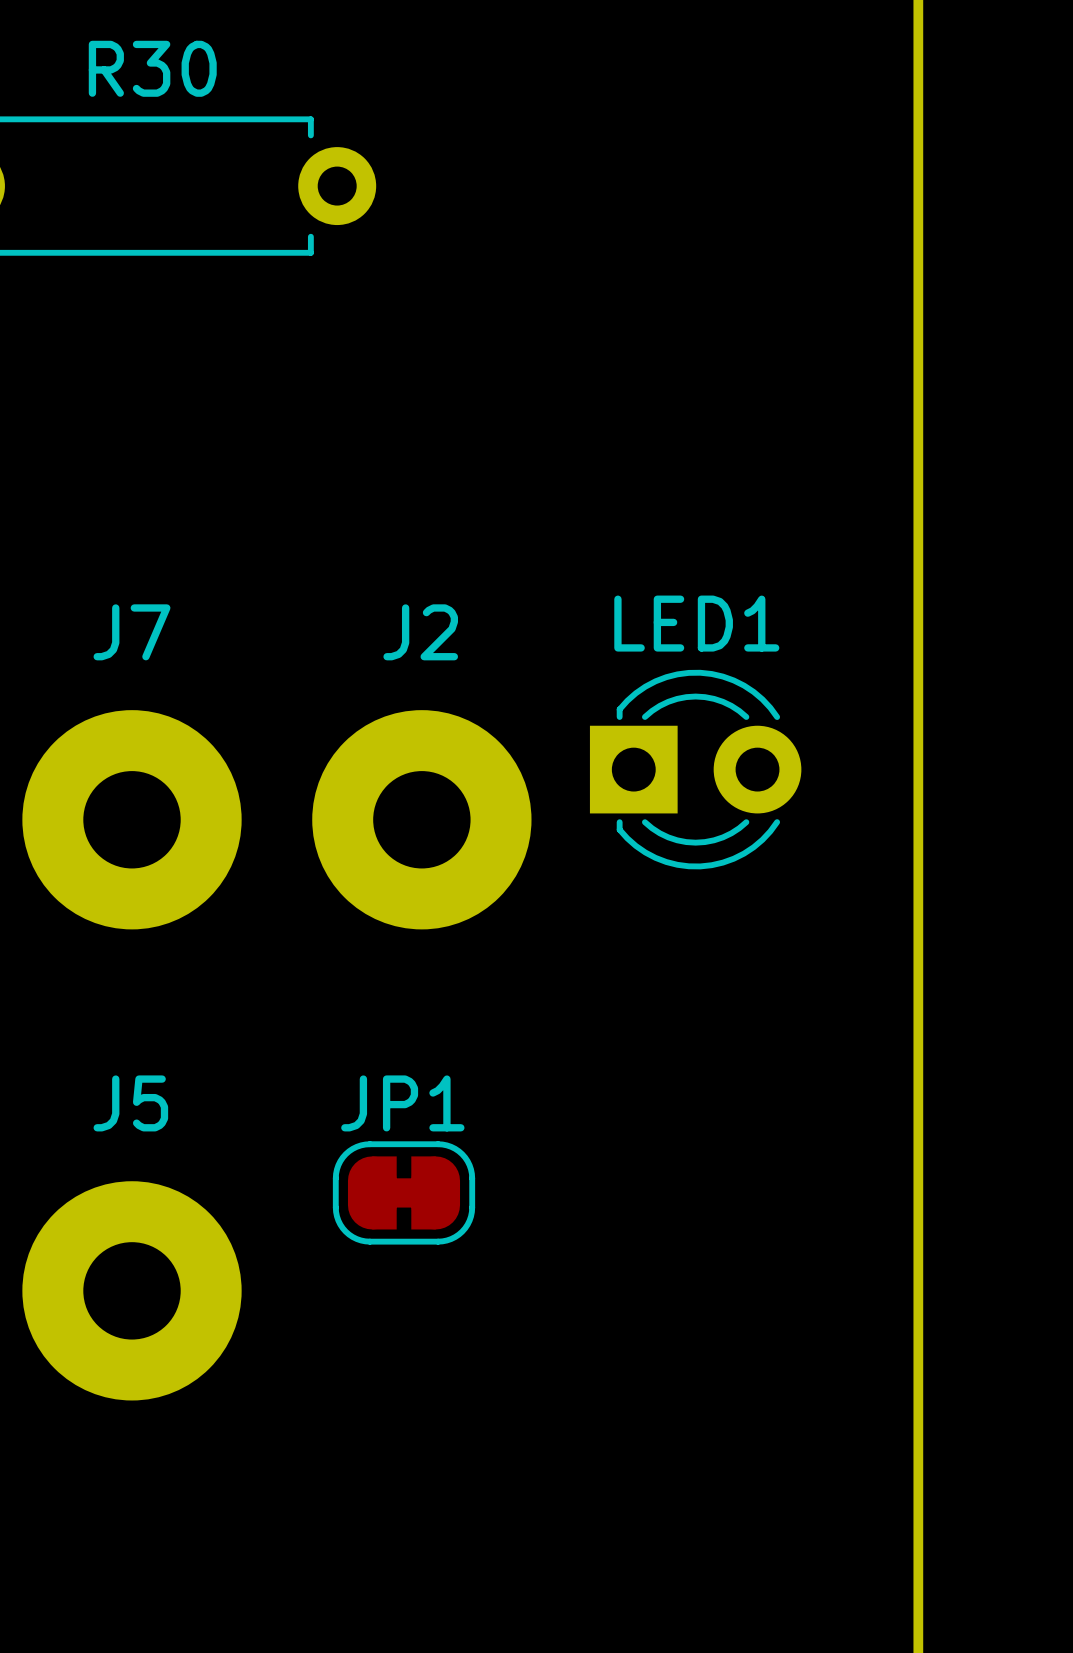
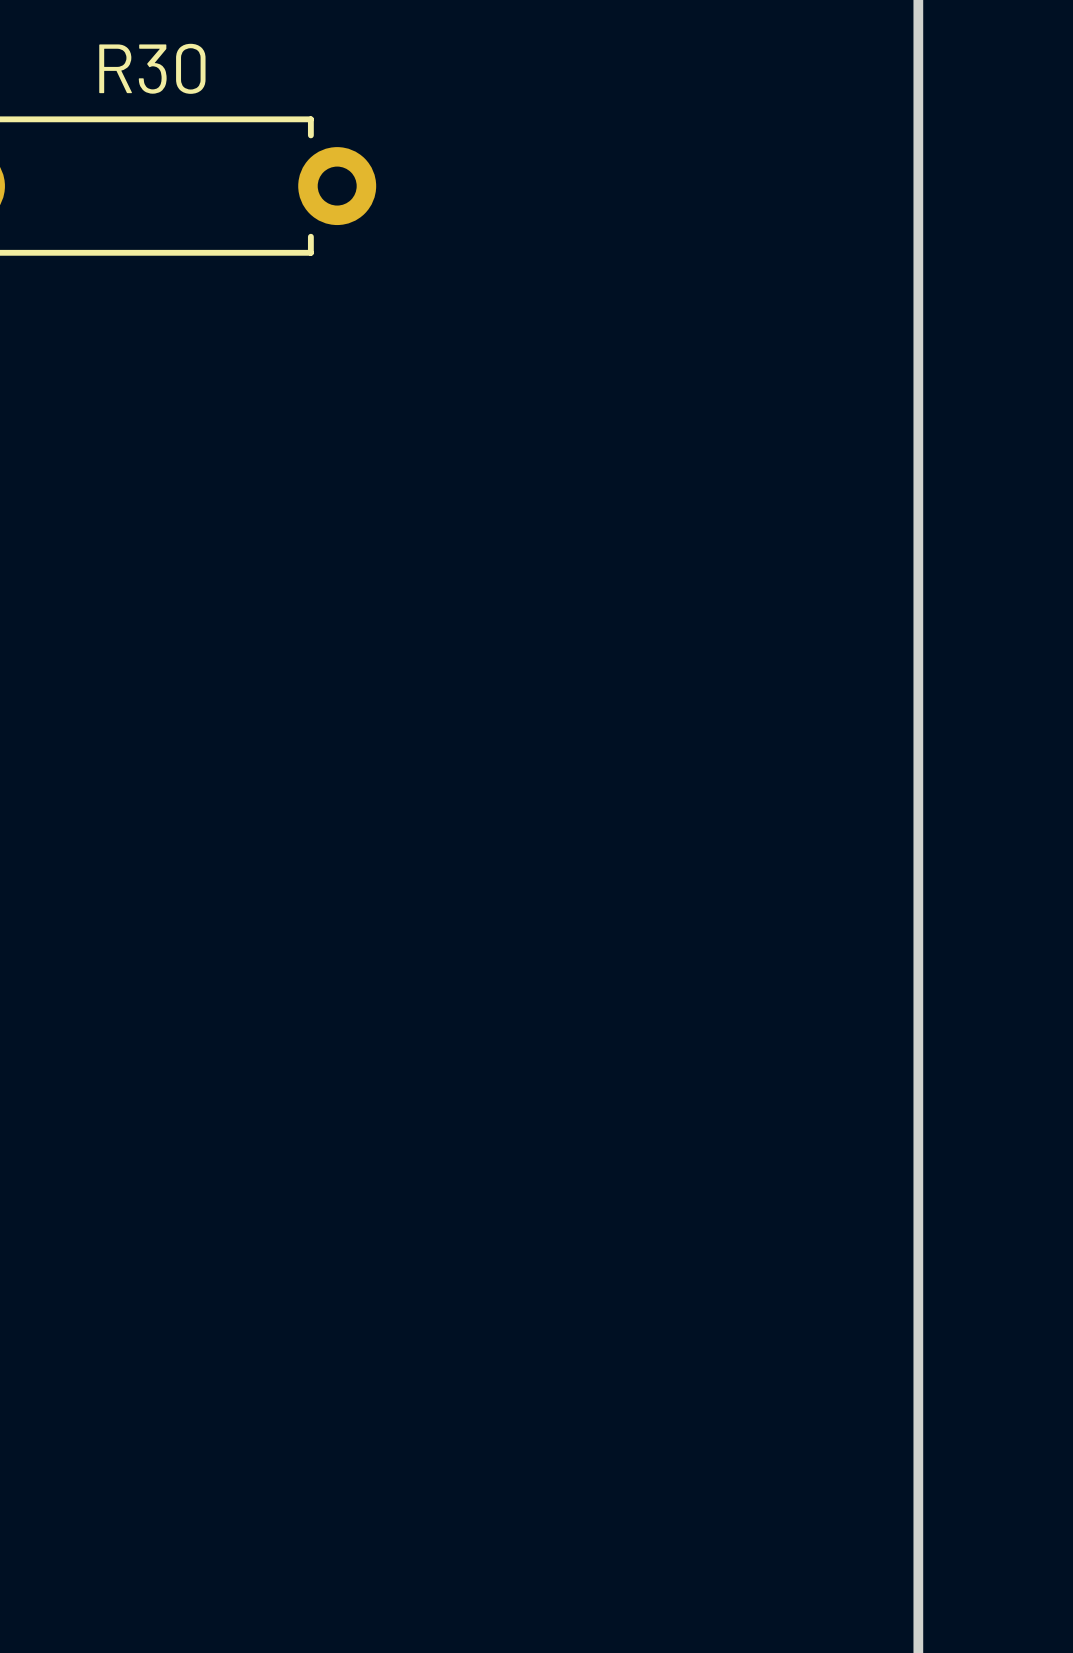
LED1: (695, 769) -> none
J7: (132, 819) -> none
J2: (421, 819) -> none
JP1: (404, 1192) -> none
J5: (132, 1290) -> none

